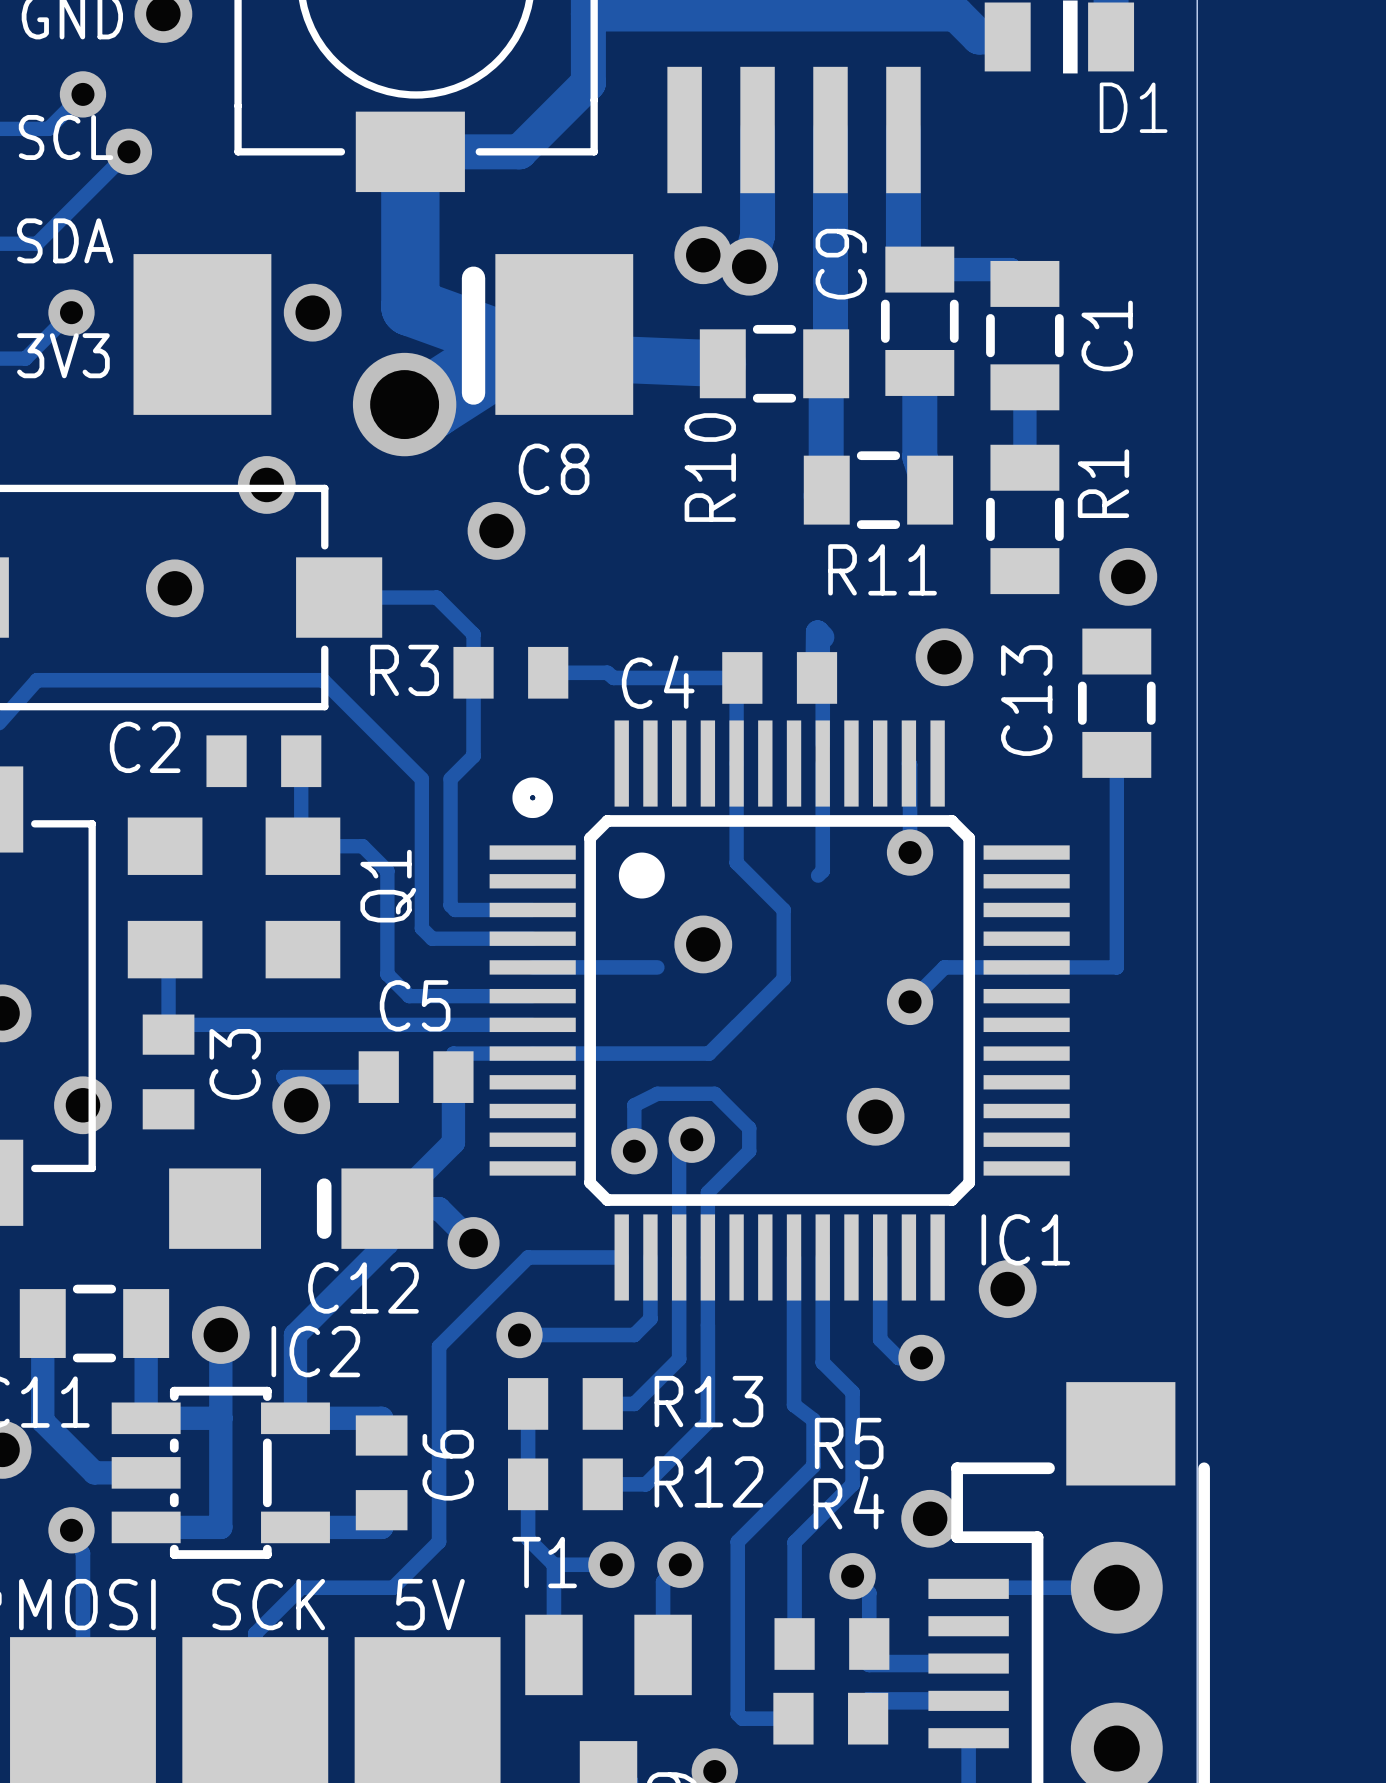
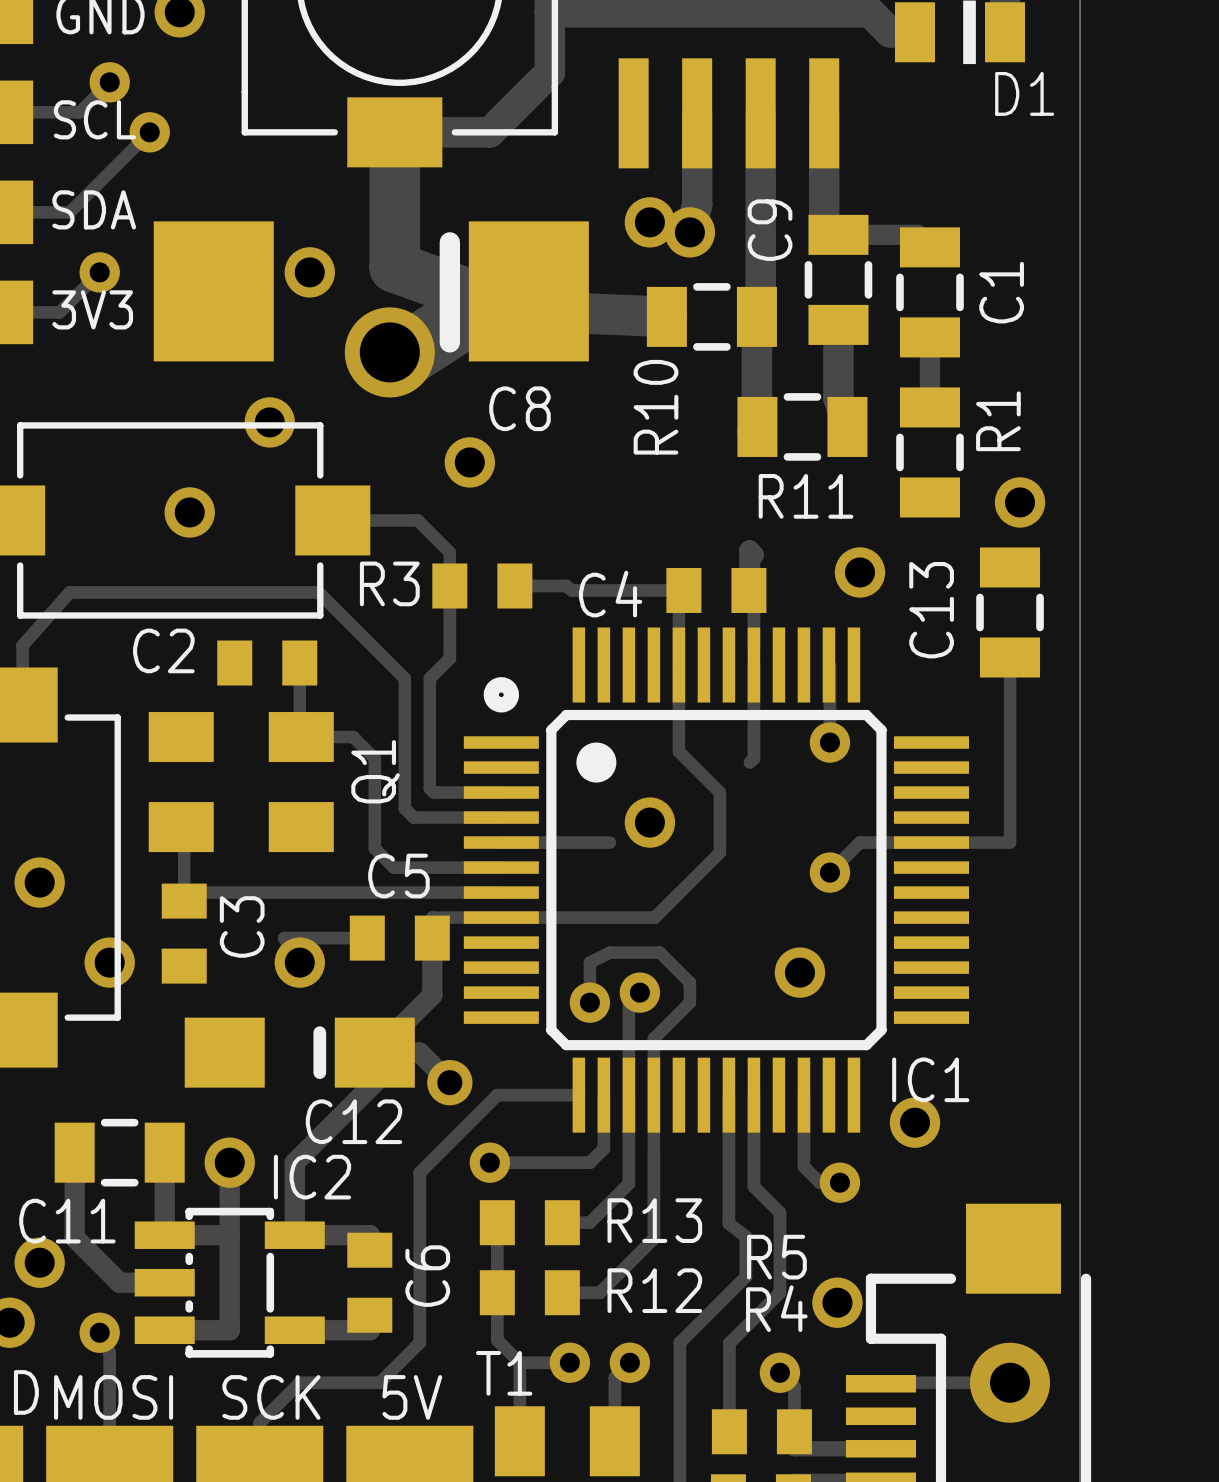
via position: (930, 1518) -> (837, 1302)
T1 name position: T1 (544, 1562) -> T1 (504, 1373)

